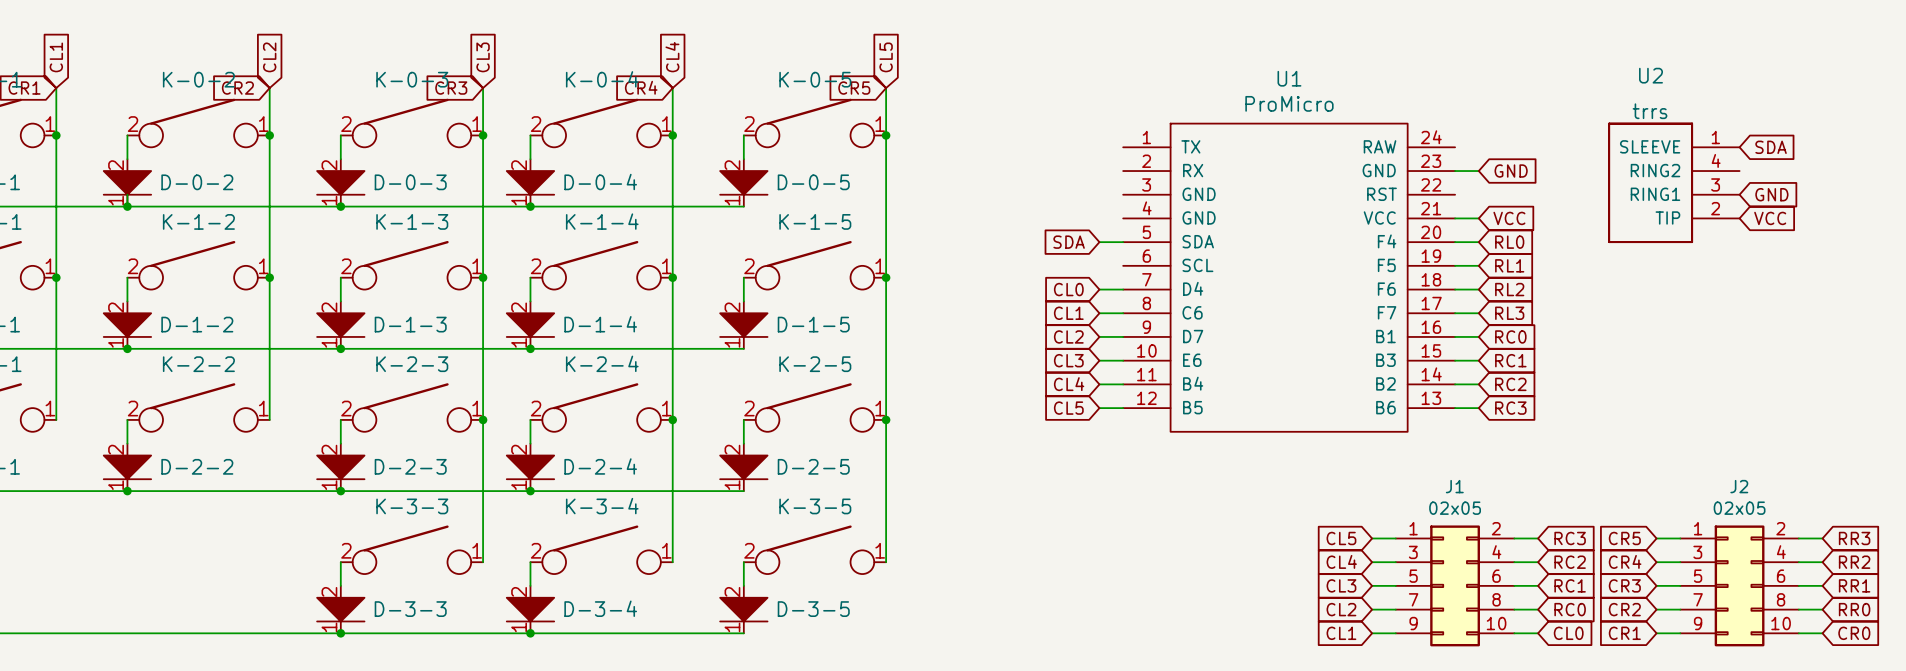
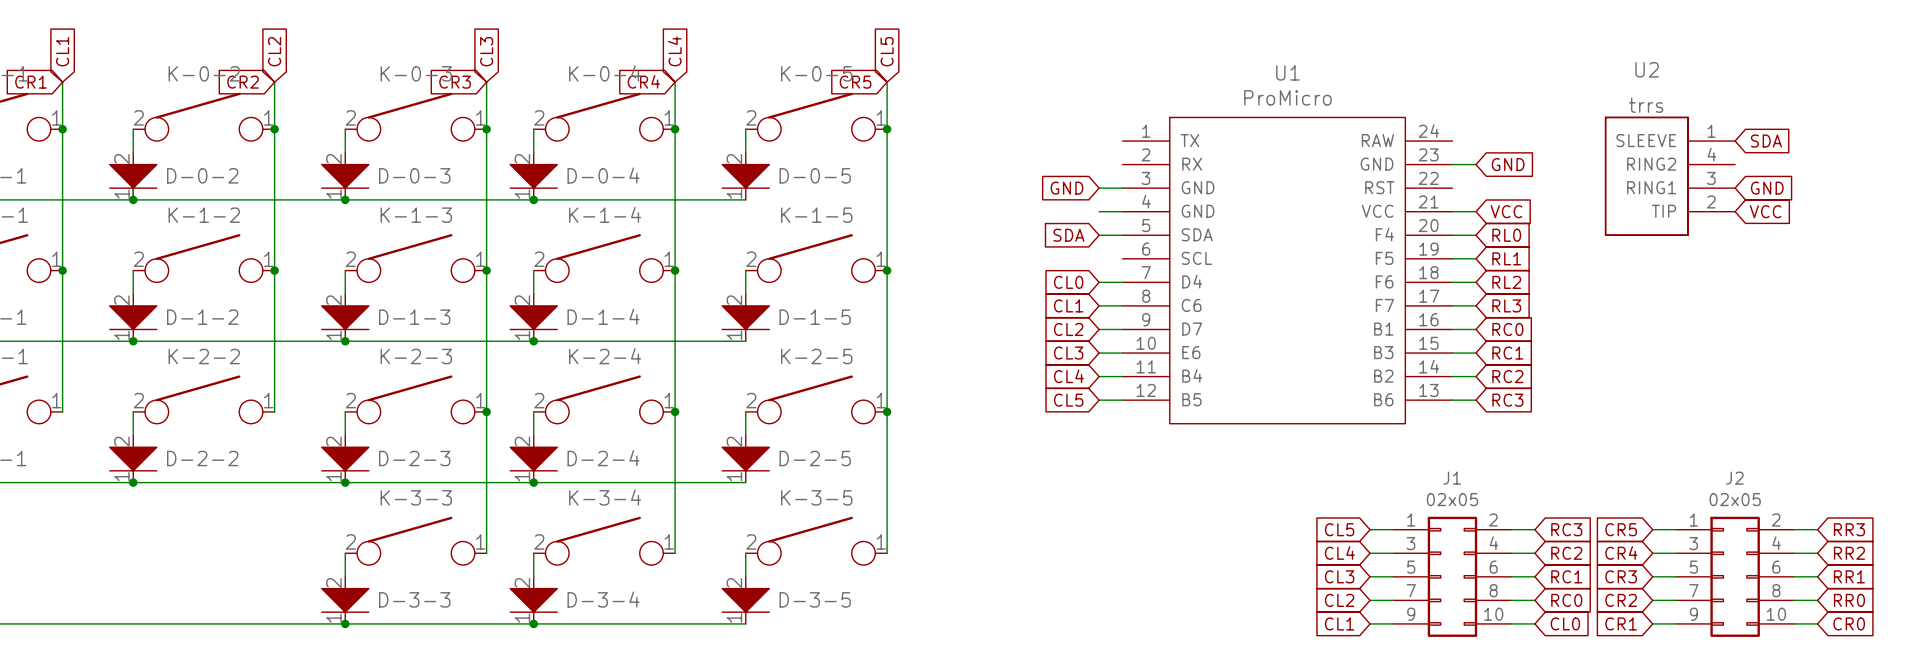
global label: none -> GND (1066, 188)
wire: none -> (1099, 188) (1122, 188)
wire: none -> (1099, 211) (1122, 211)

